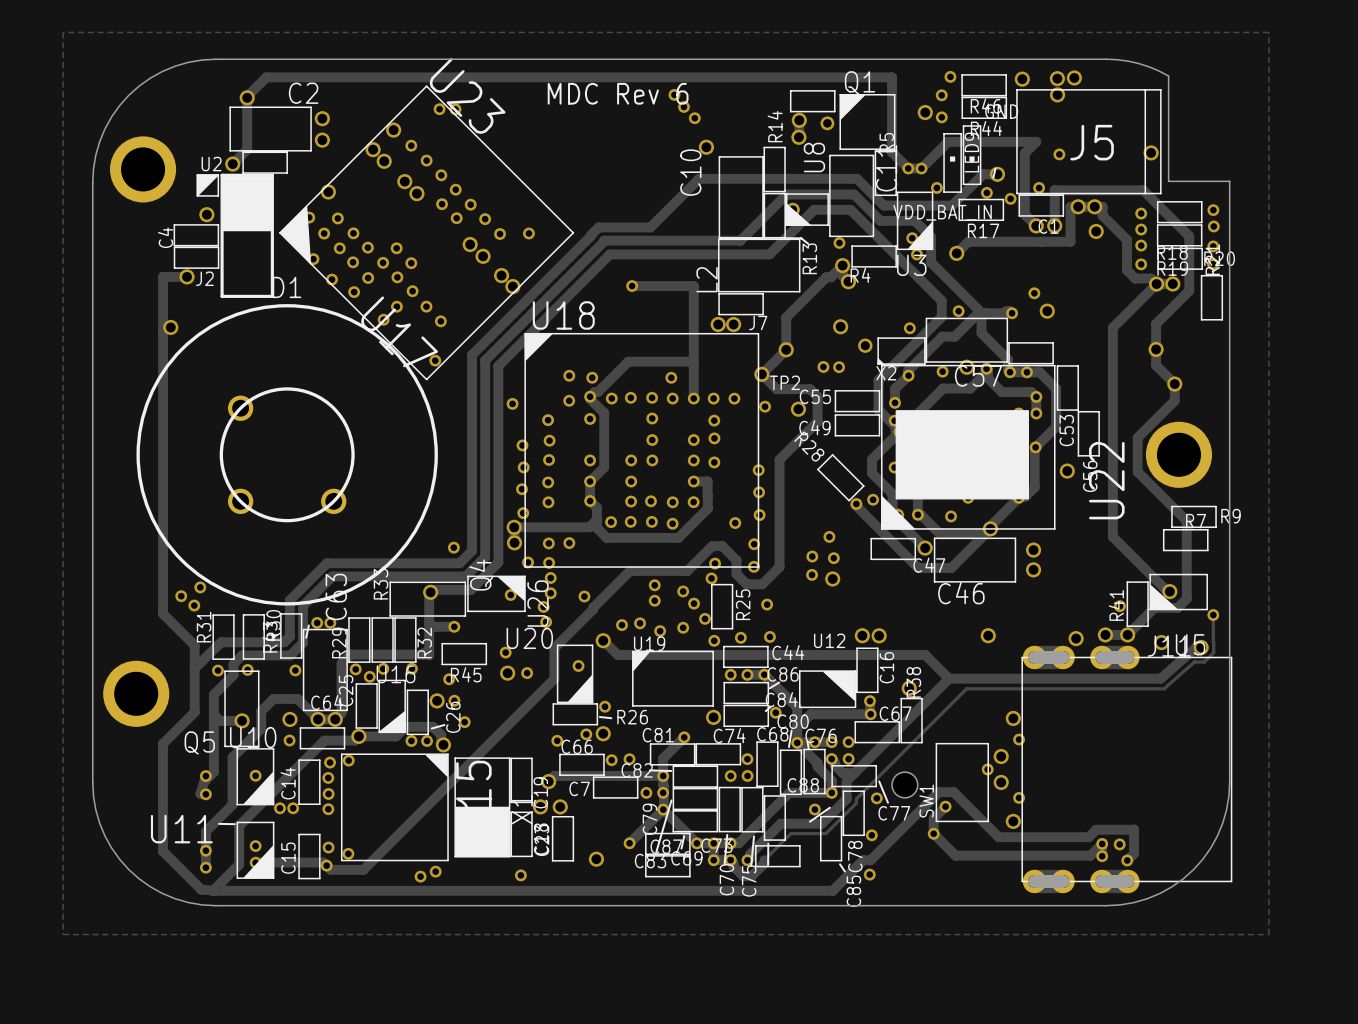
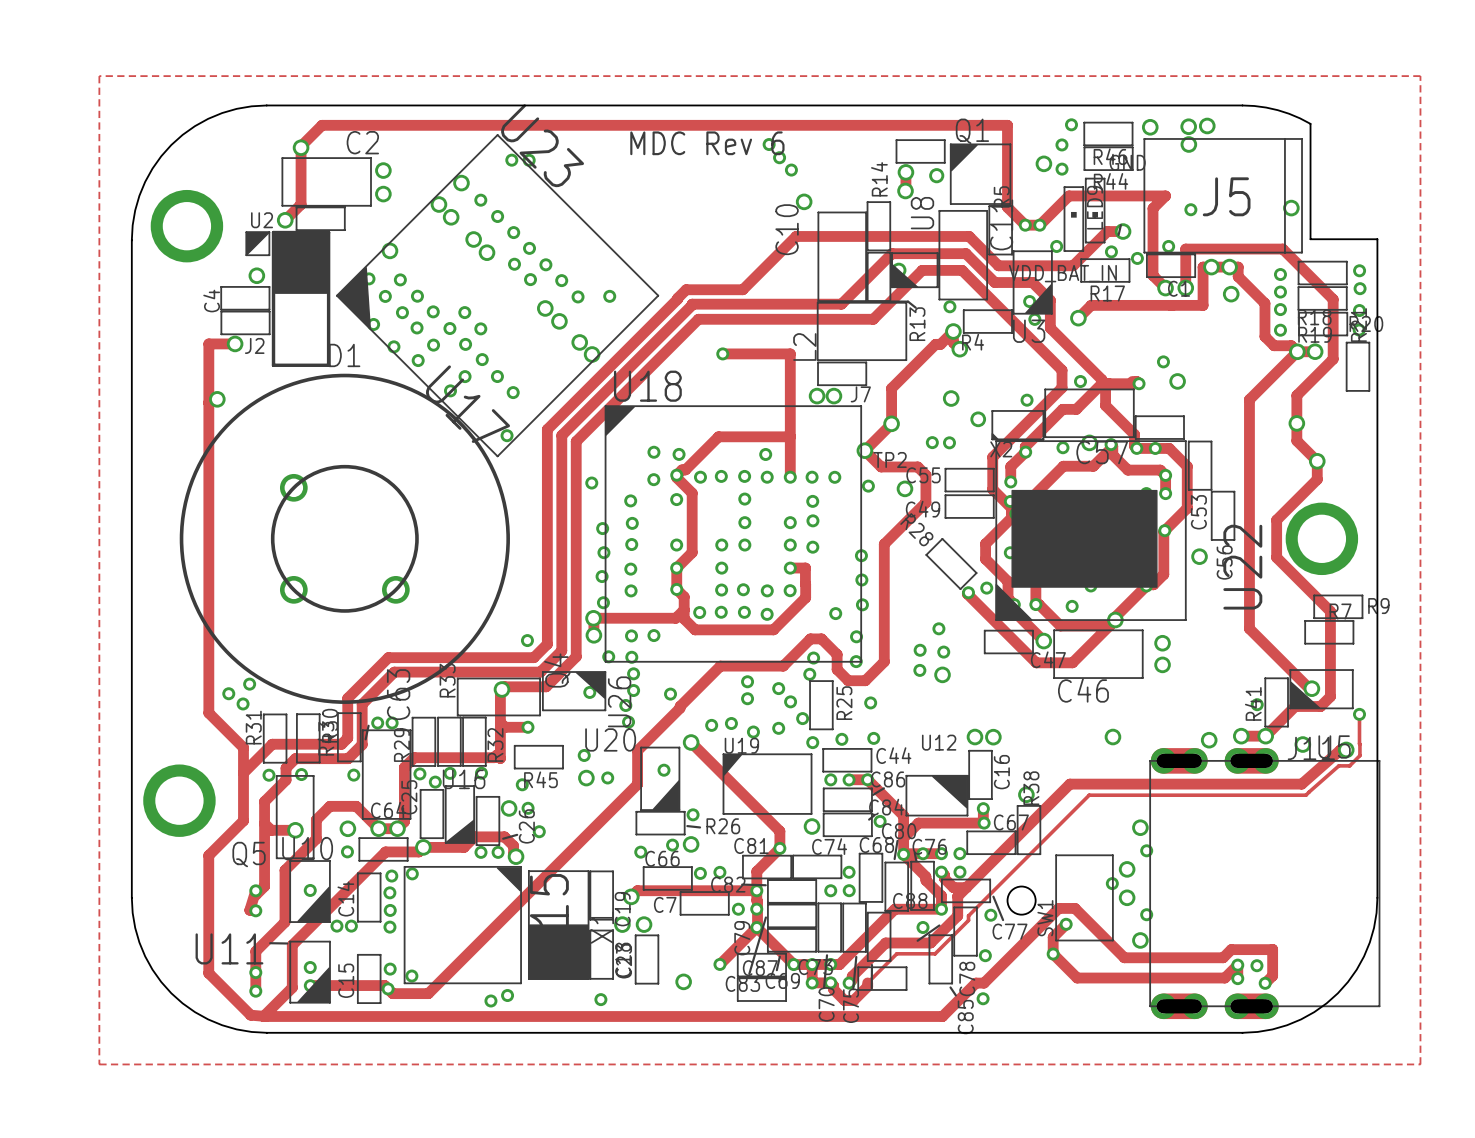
track: (603, 640) (617, 654) (925, 654) (949, 678) -> (691, 742) (779, 831) (779, 848)

